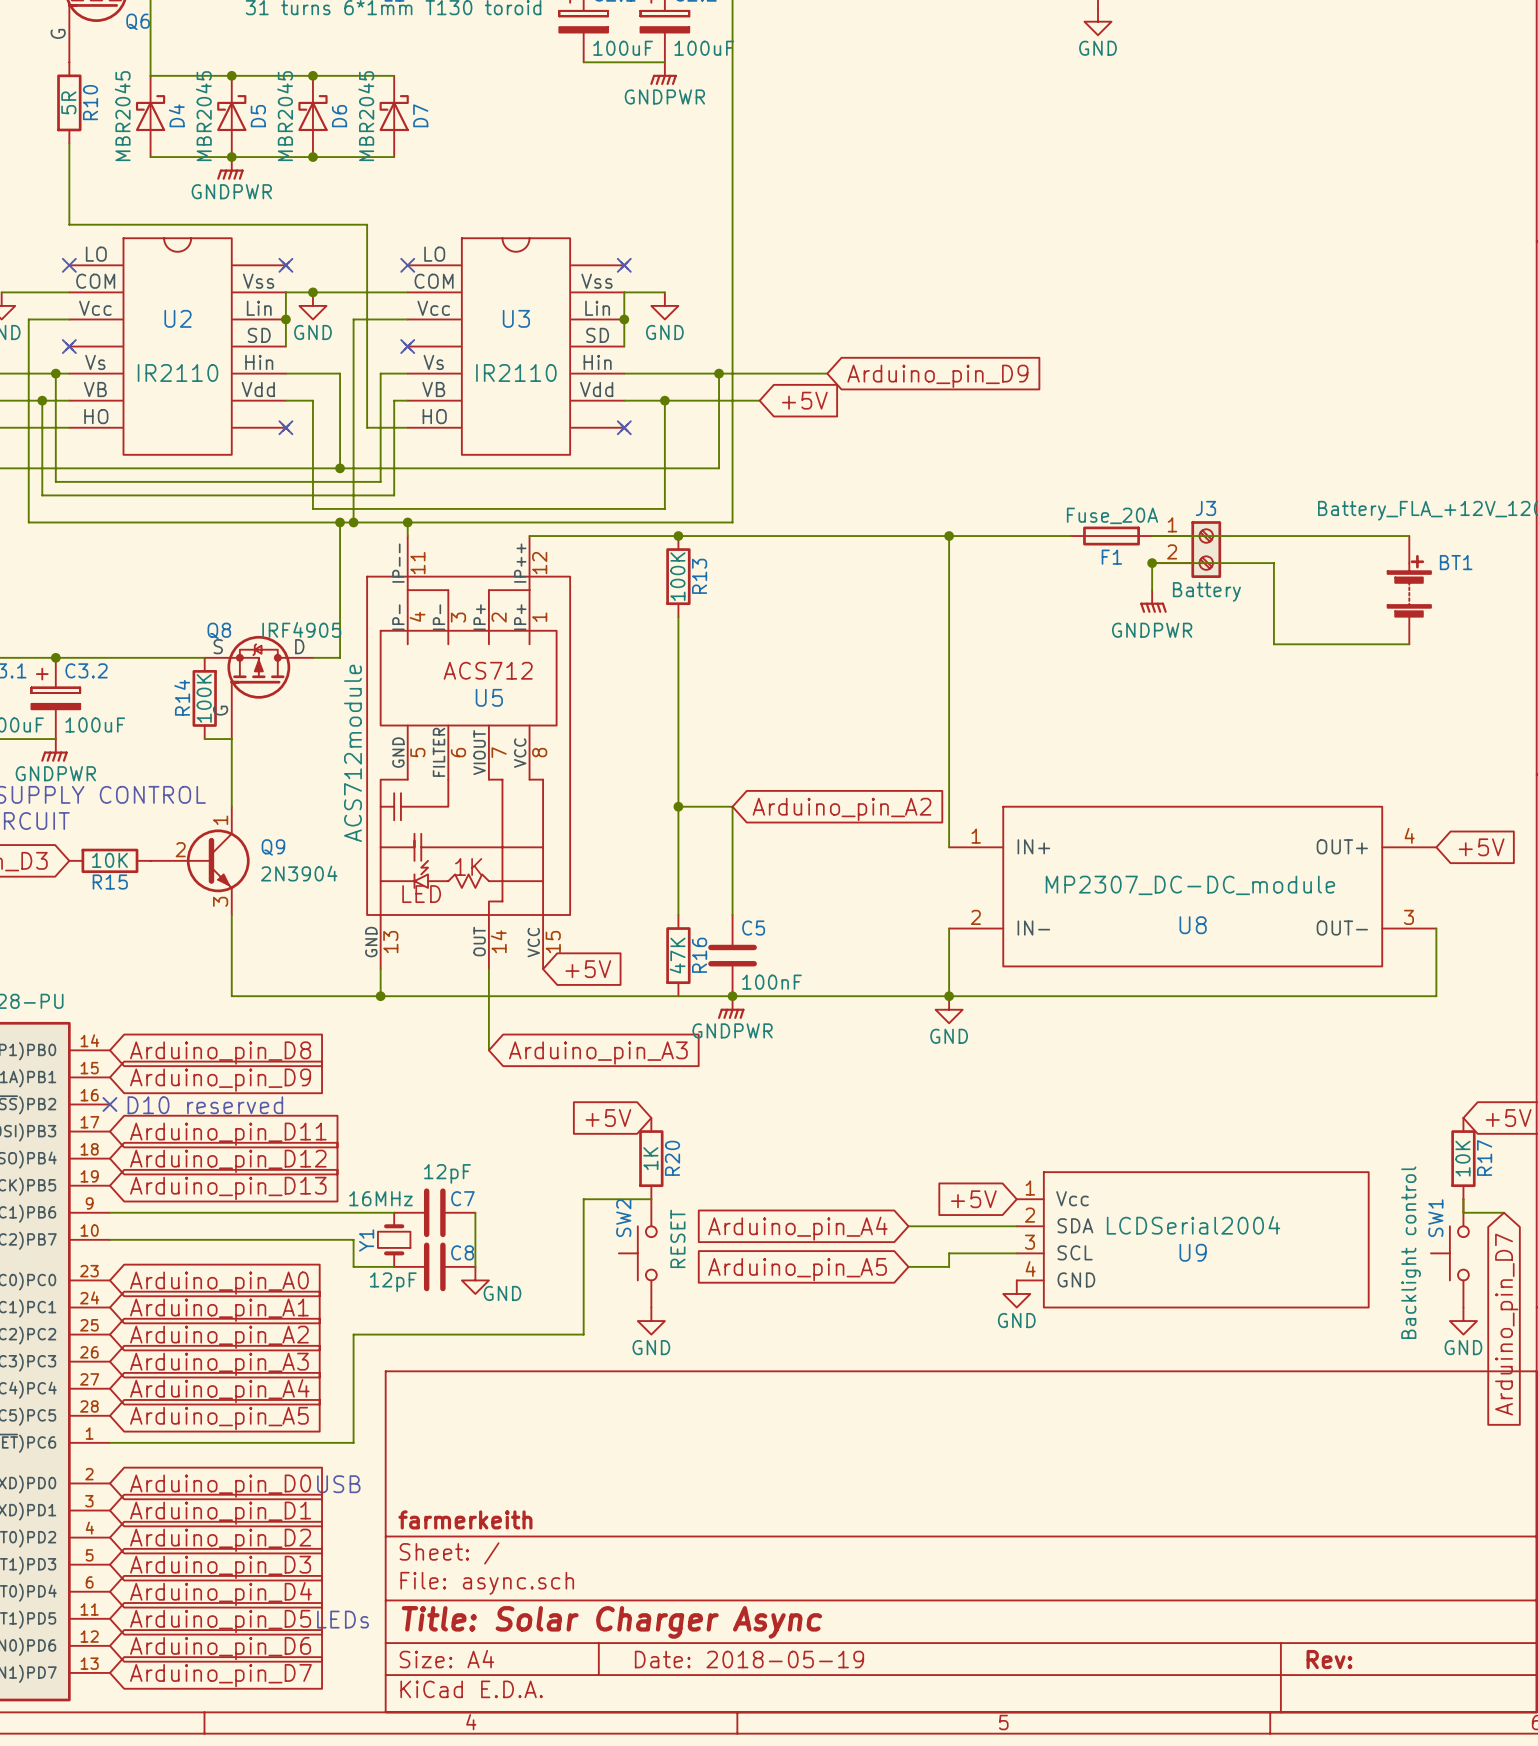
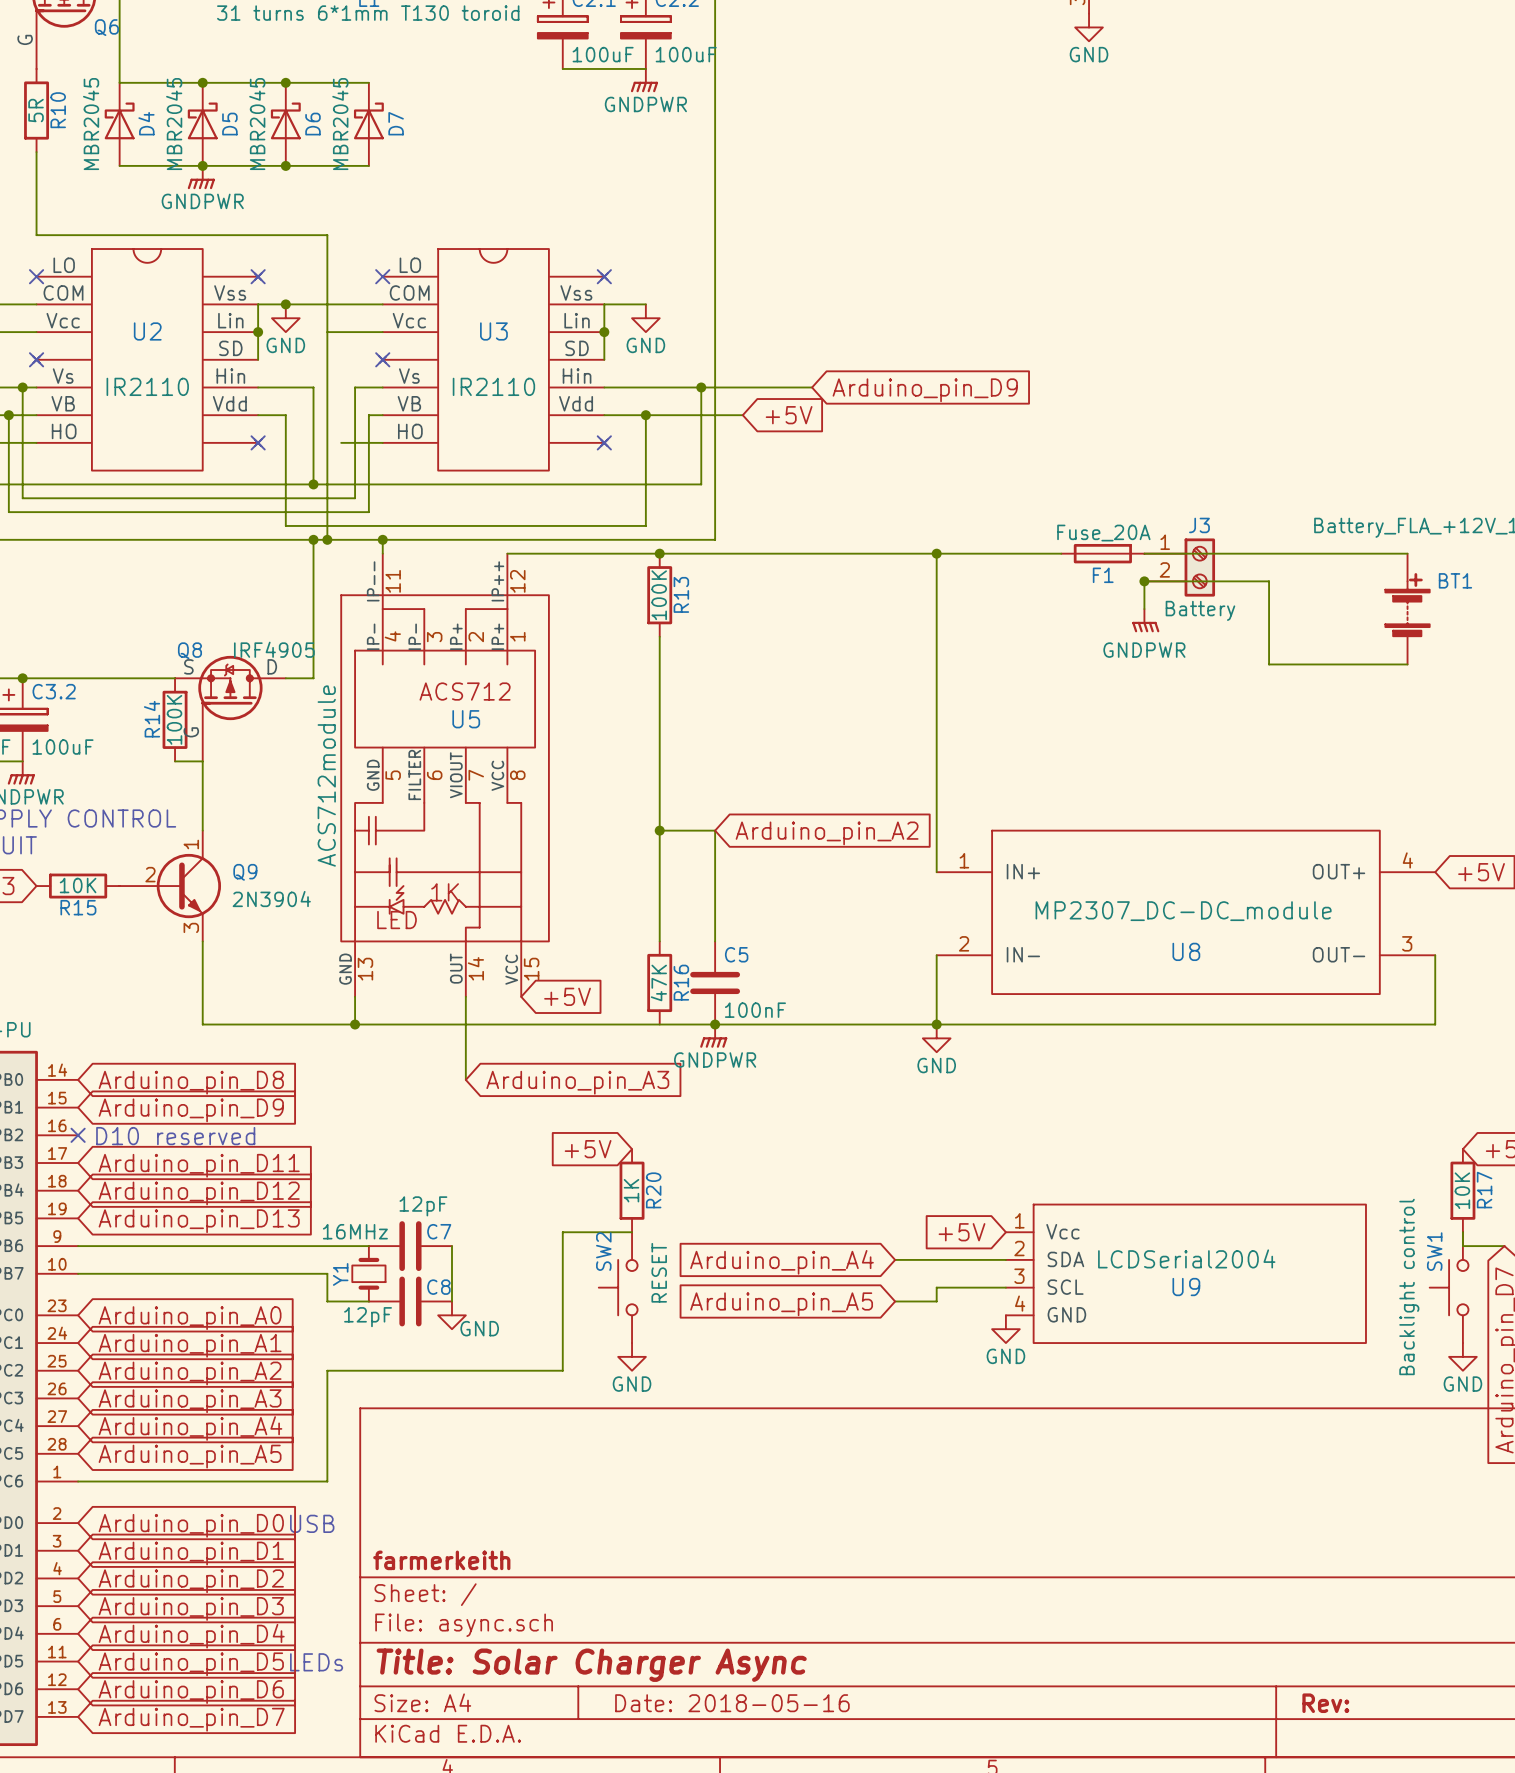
wire: (353, 224) (367, 224) (367, 427) -> (327, 235) (327, 332)
title block: Date: 2018-05-19 (749, 1659) -> Date: 2018-05-16 (732, 1703)

